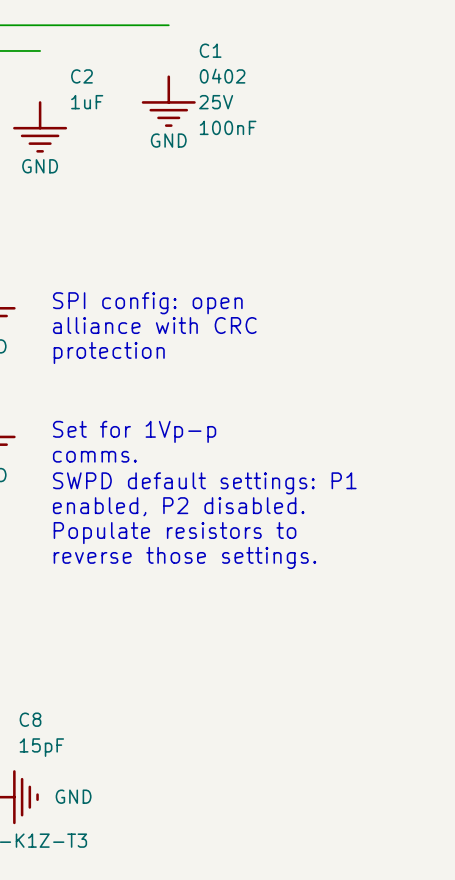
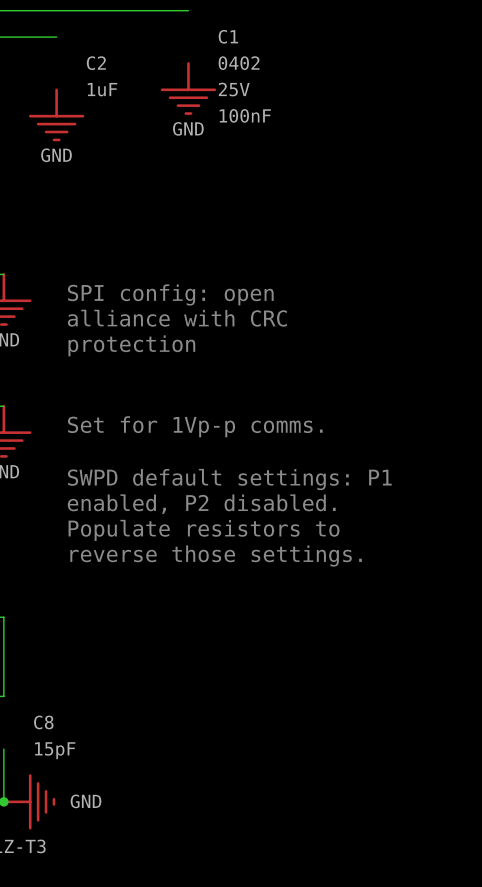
text: Set for 1Vp-p (134, 431) -> Set for 1Vp-p comms. (195, 426)
text: comms. (94, 456) -> none

